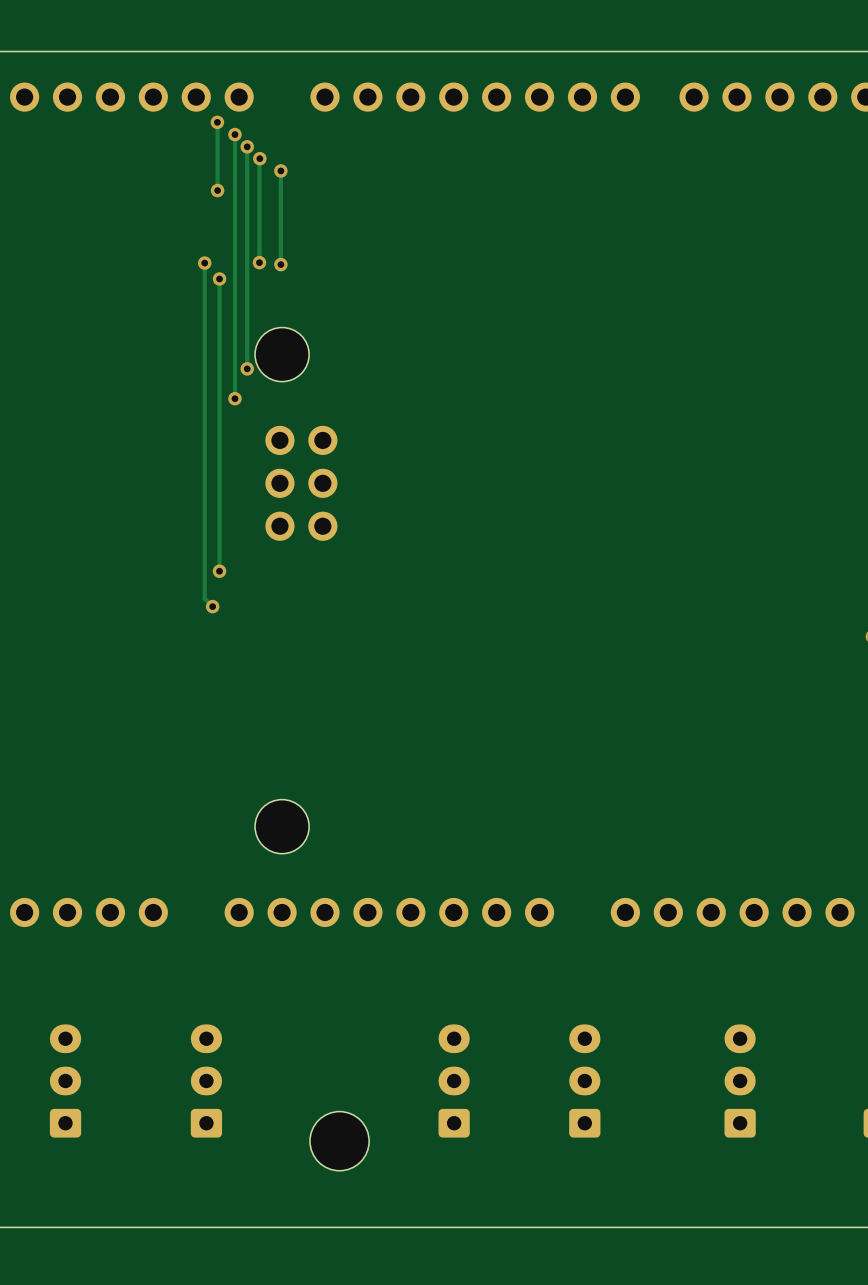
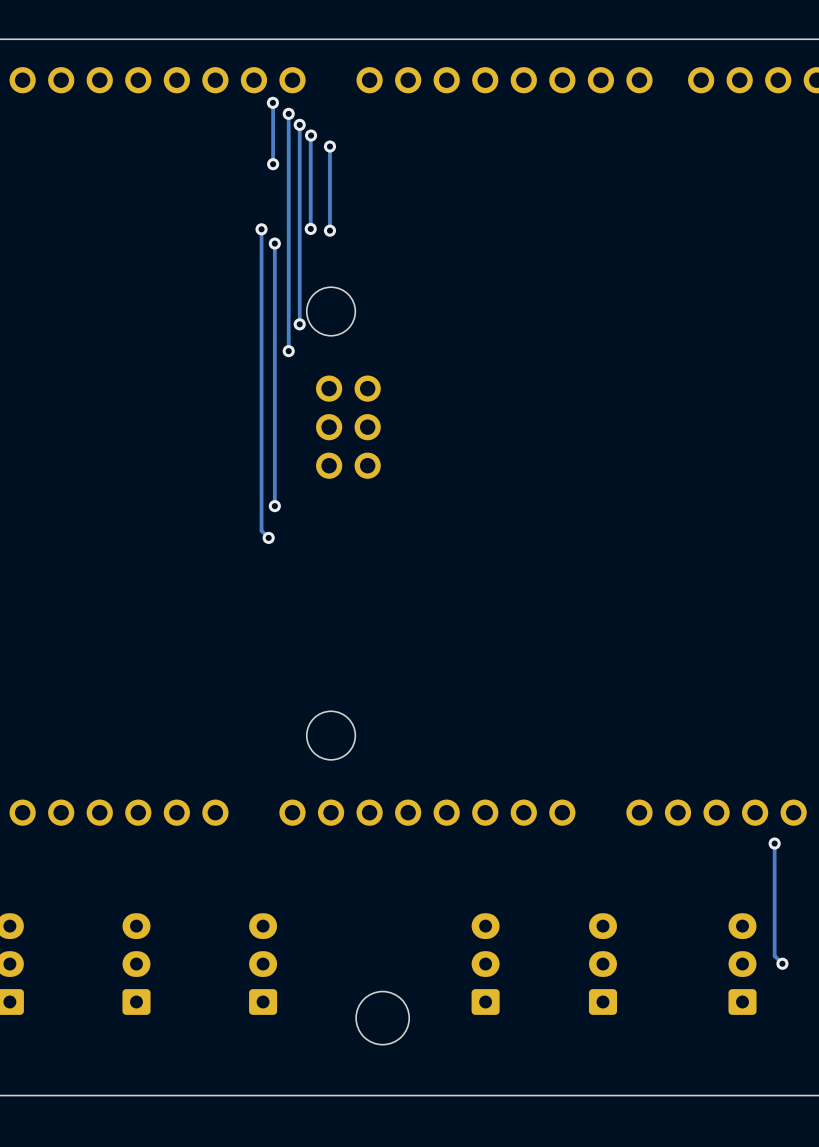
track: none -> (774, 843) (774, 955) (782, 963)
via: none -> (774, 843)
via: none -> (782, 963)

